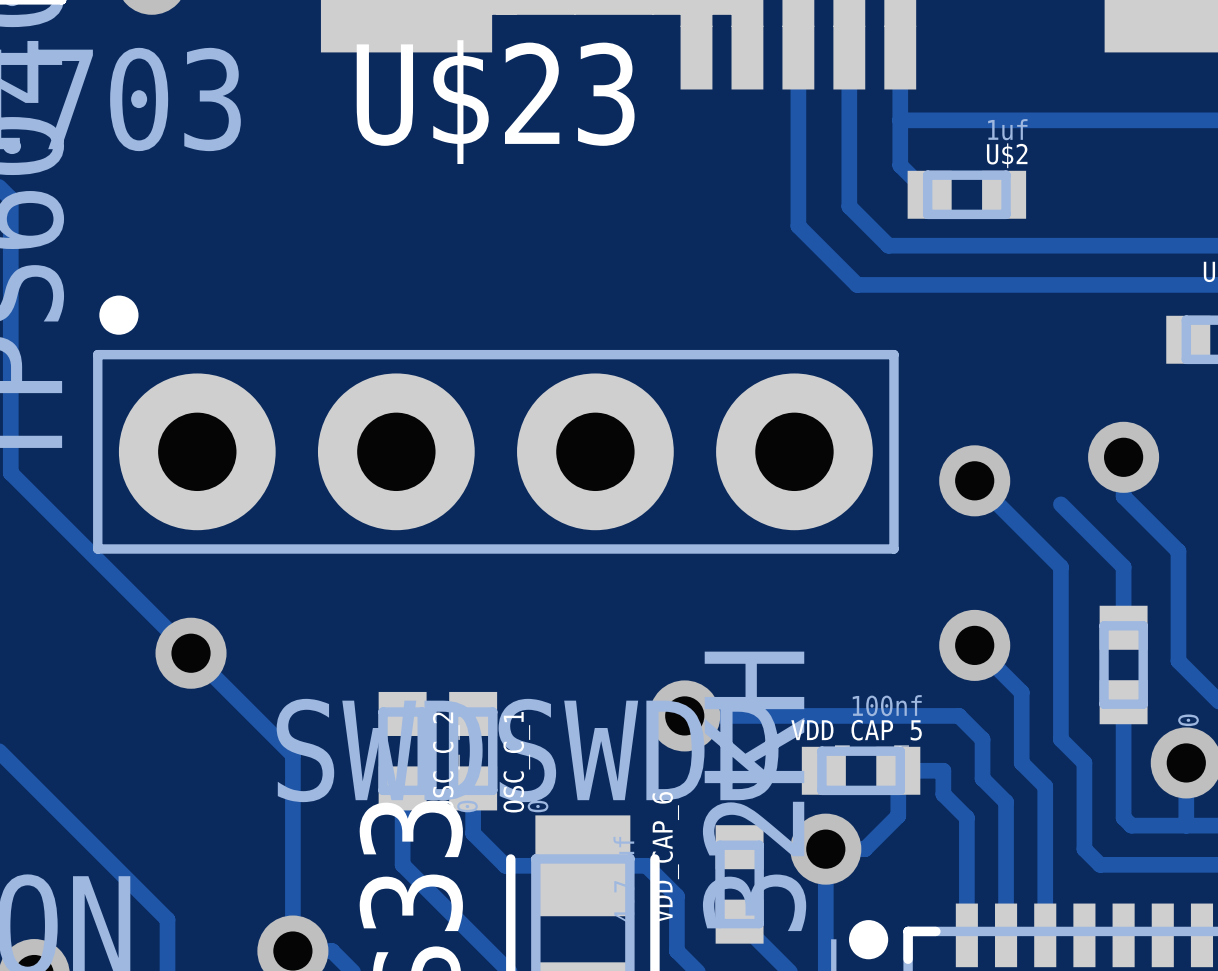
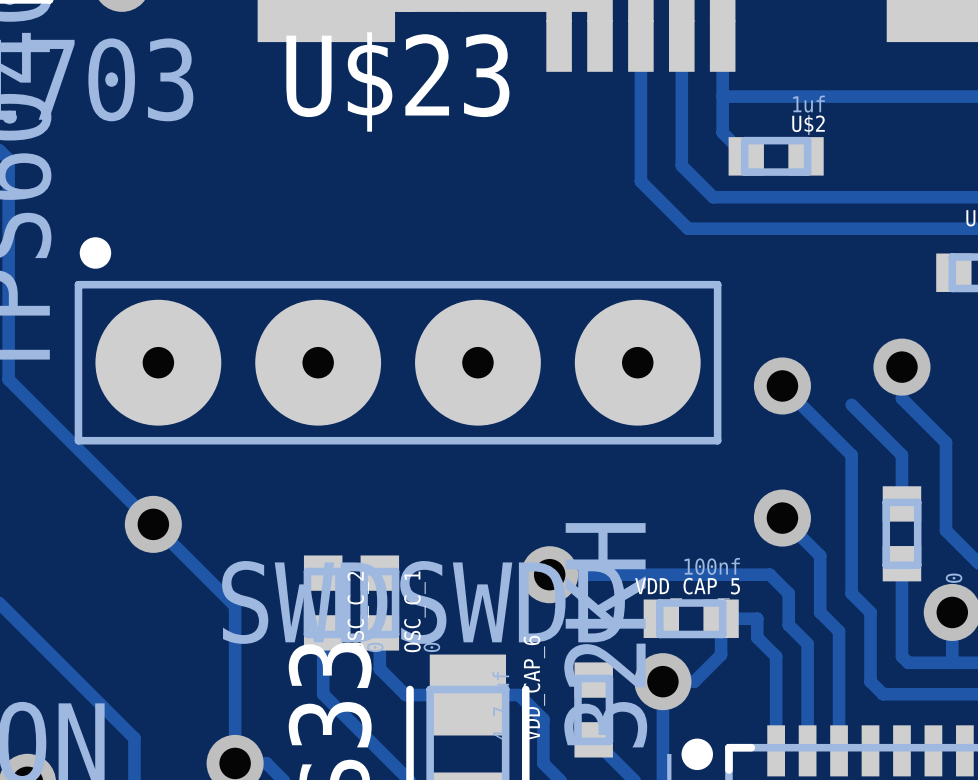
U$23 footprint: [93, 295, 899, 554] -> [74, 237, 722, 445]

